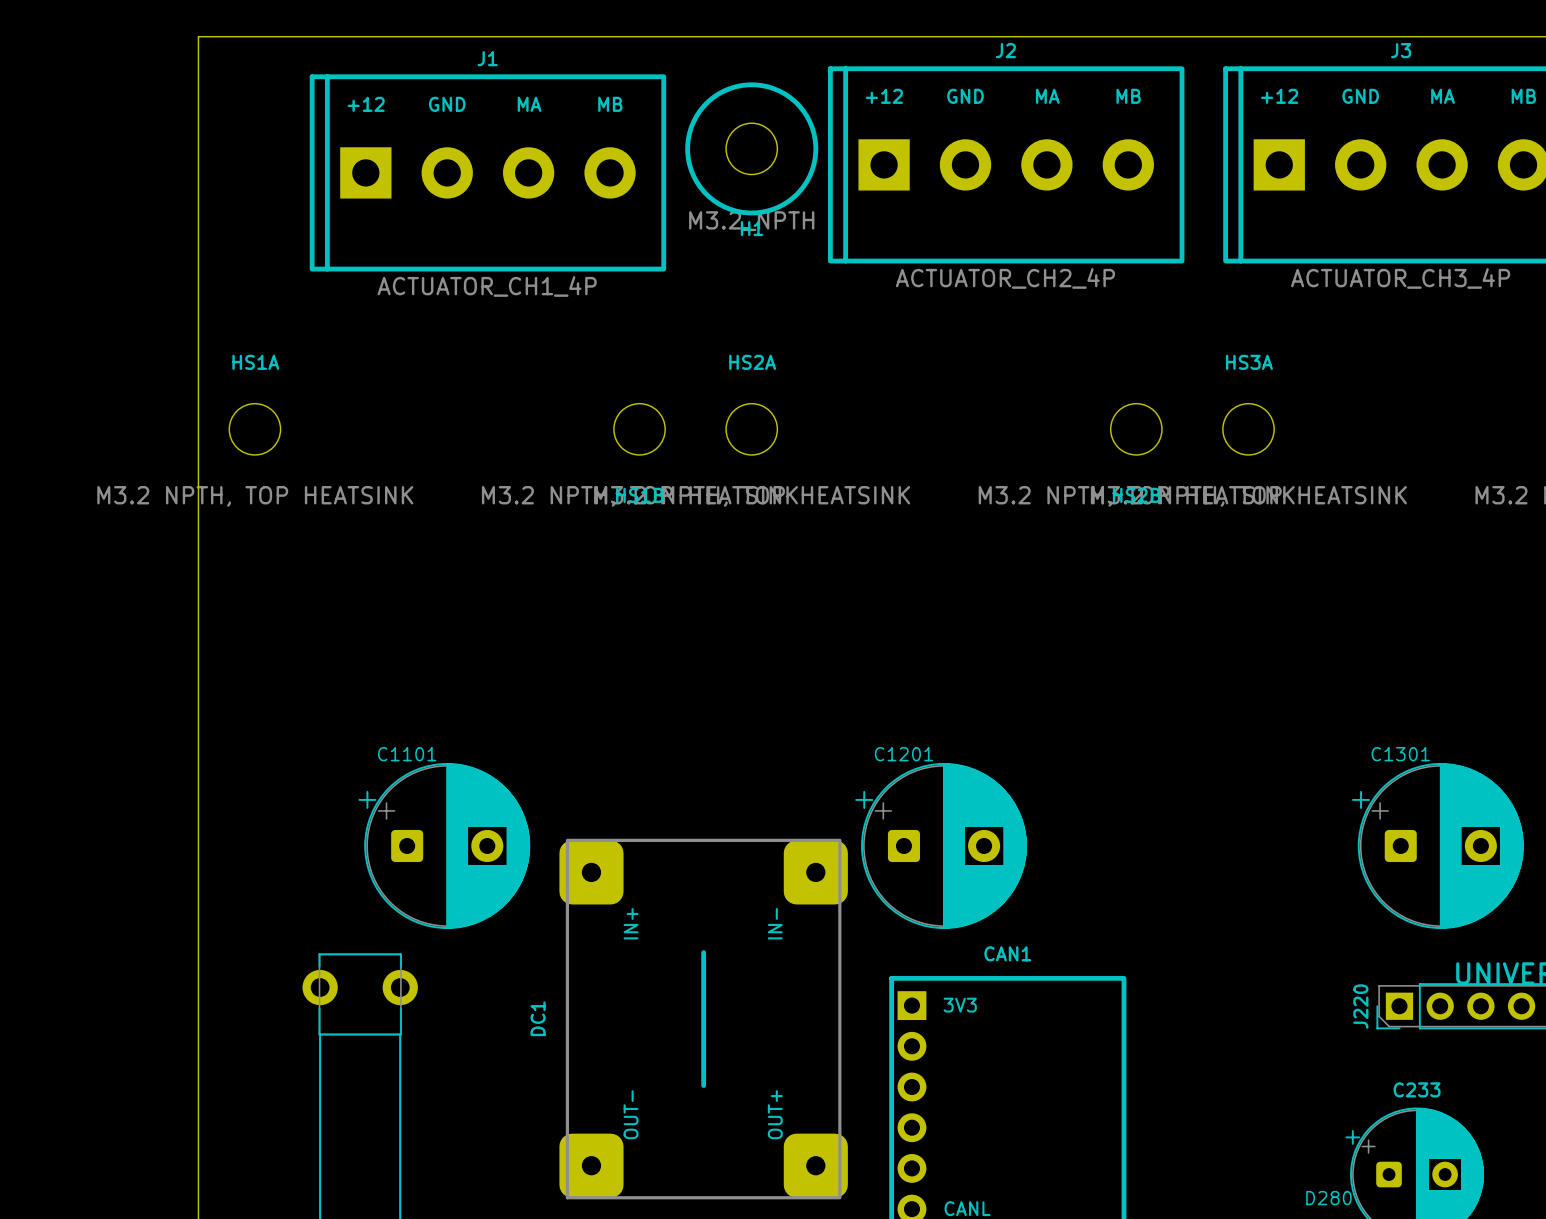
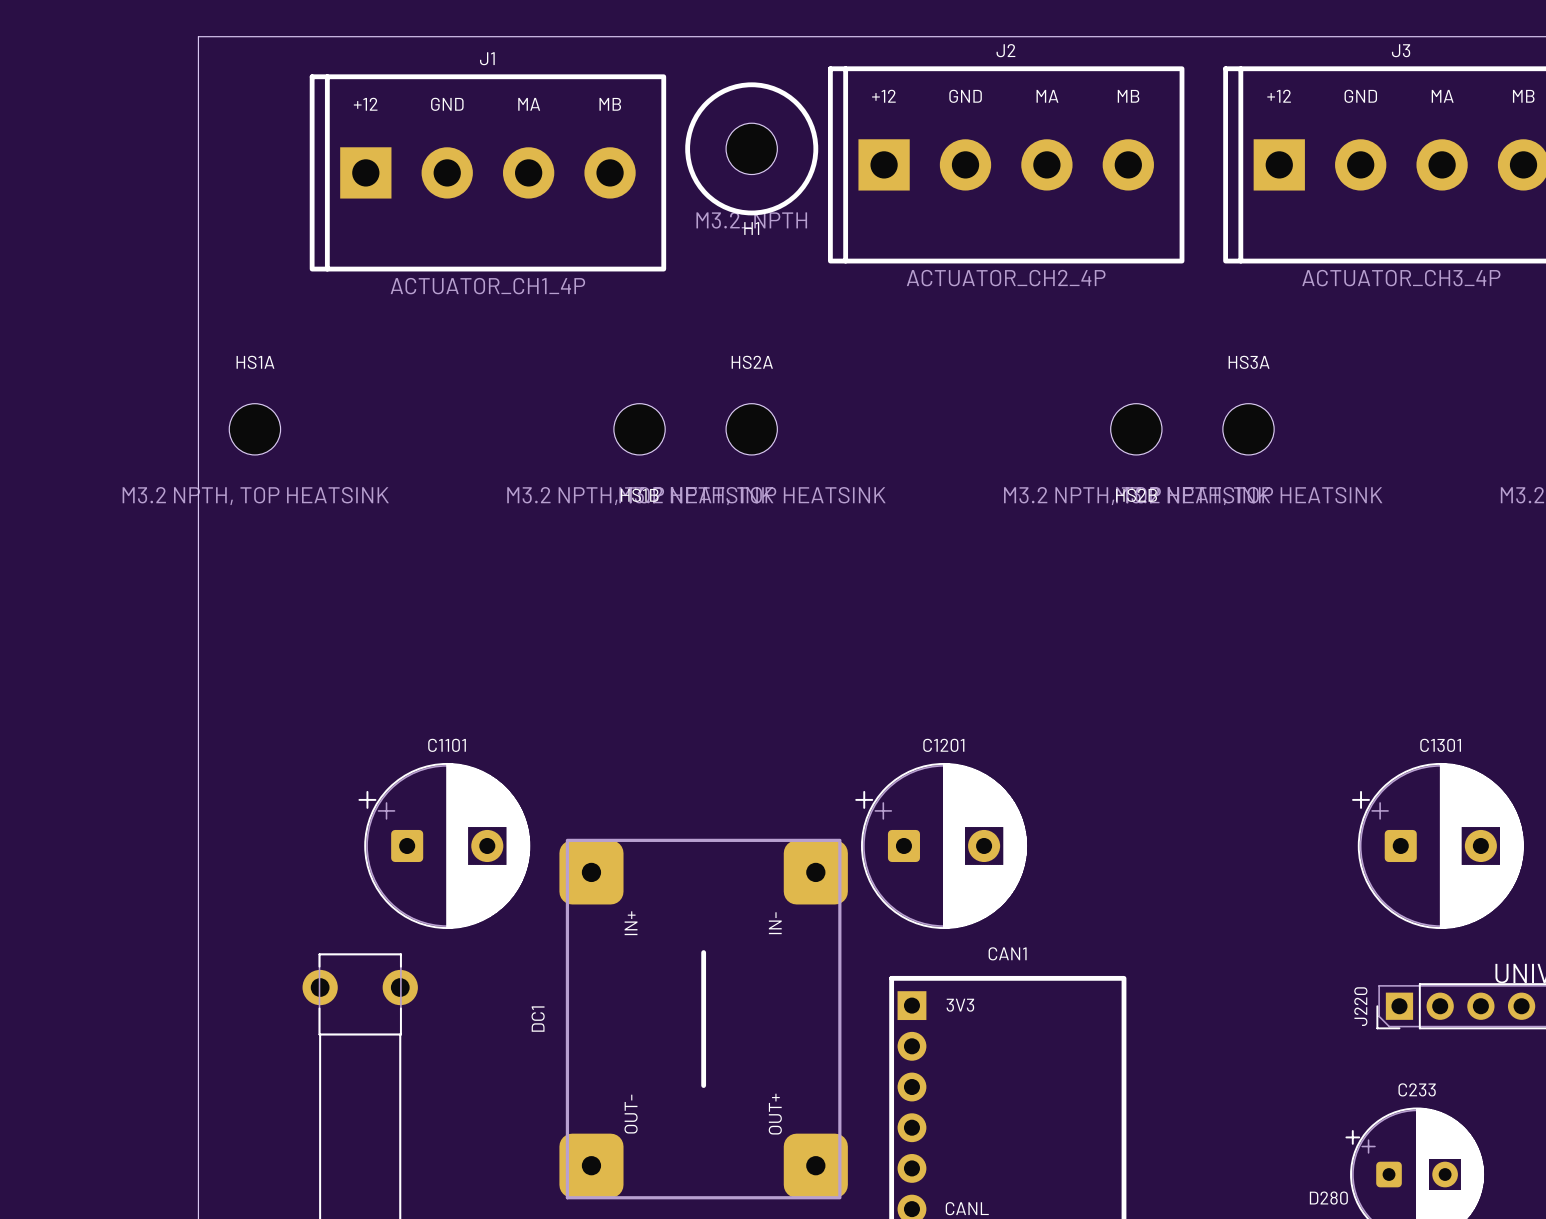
C1101 name position: C1101 (407, 754) -> C1101 (447, 745)
C1201 name position: C1201 (903, 754) -> C1201 (943, 745)
C1301 name position: C1301 (1400, 754) -> C1301 (1440, 745)

